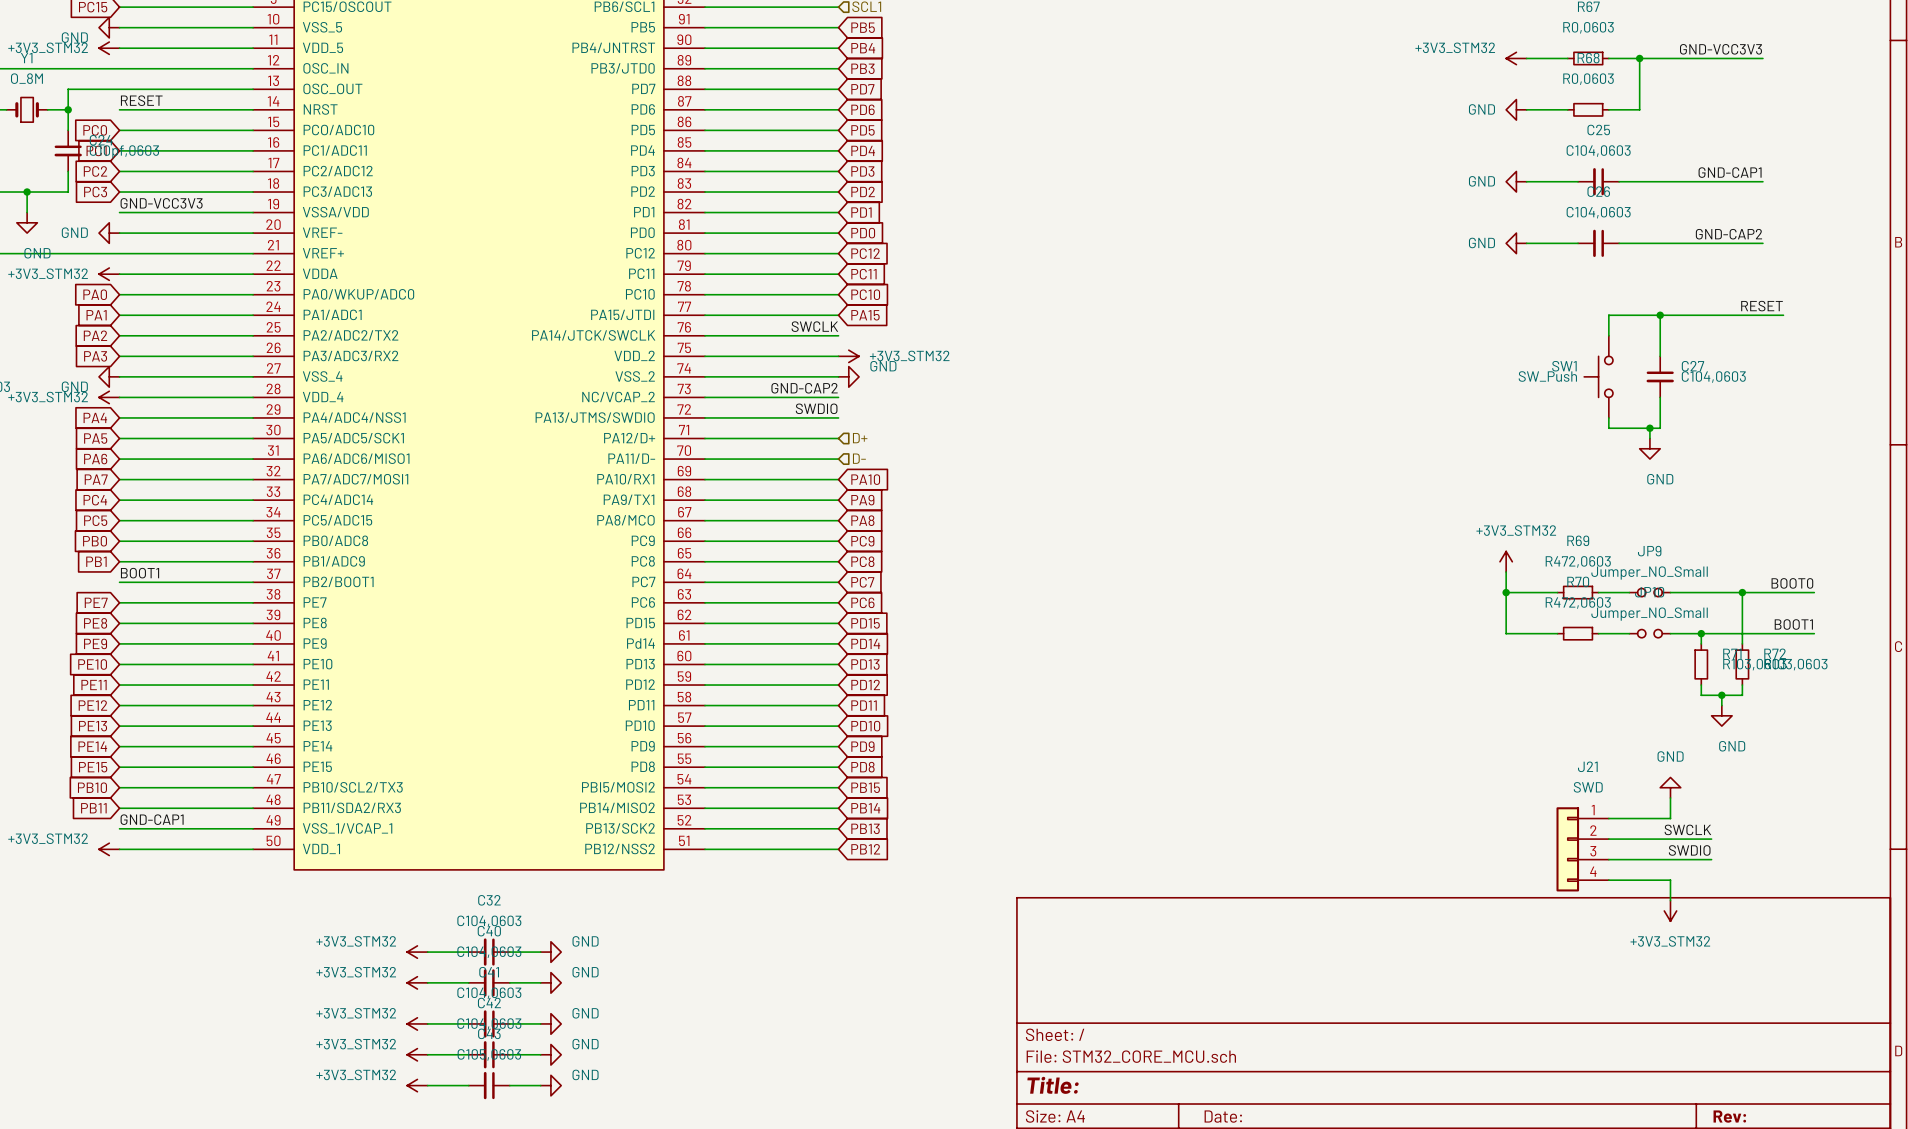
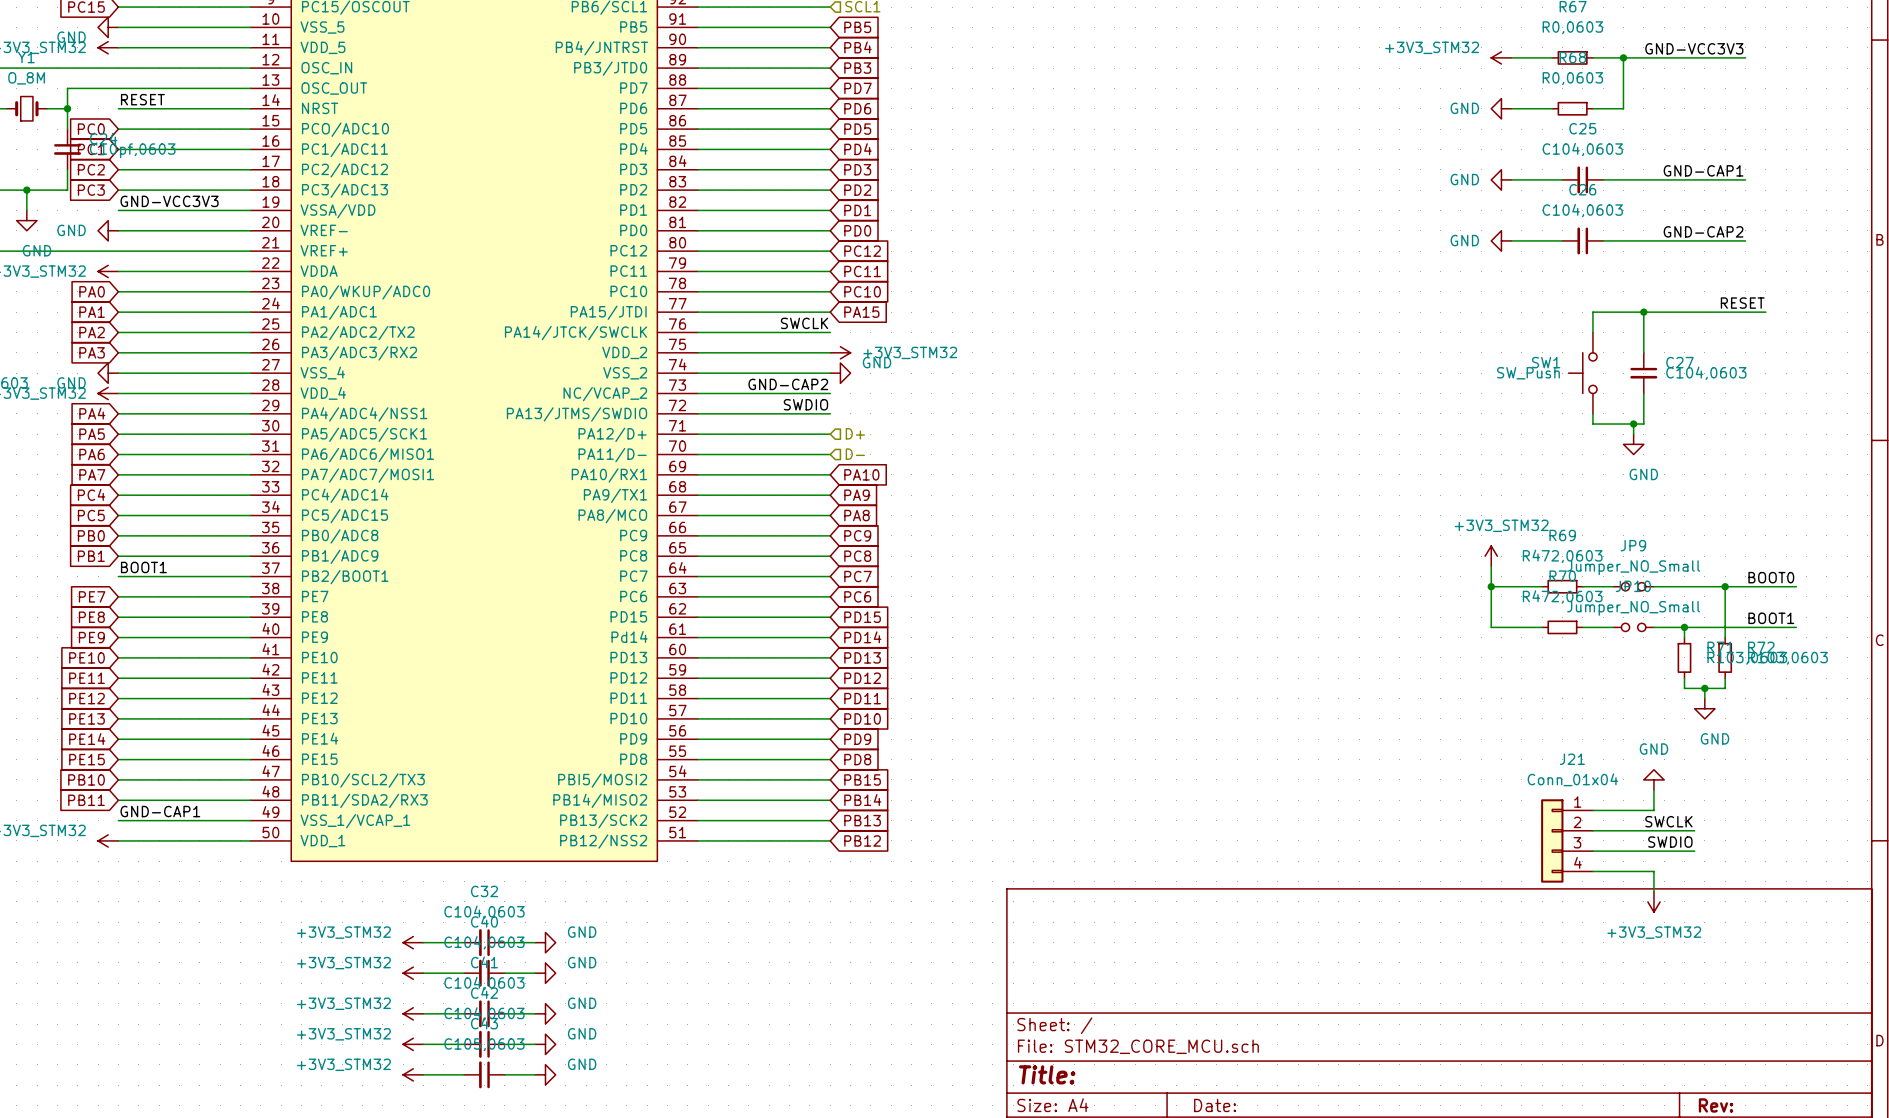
J21 value: SWD (1588, 787) -> Conn_01x04 (1572, 779)

